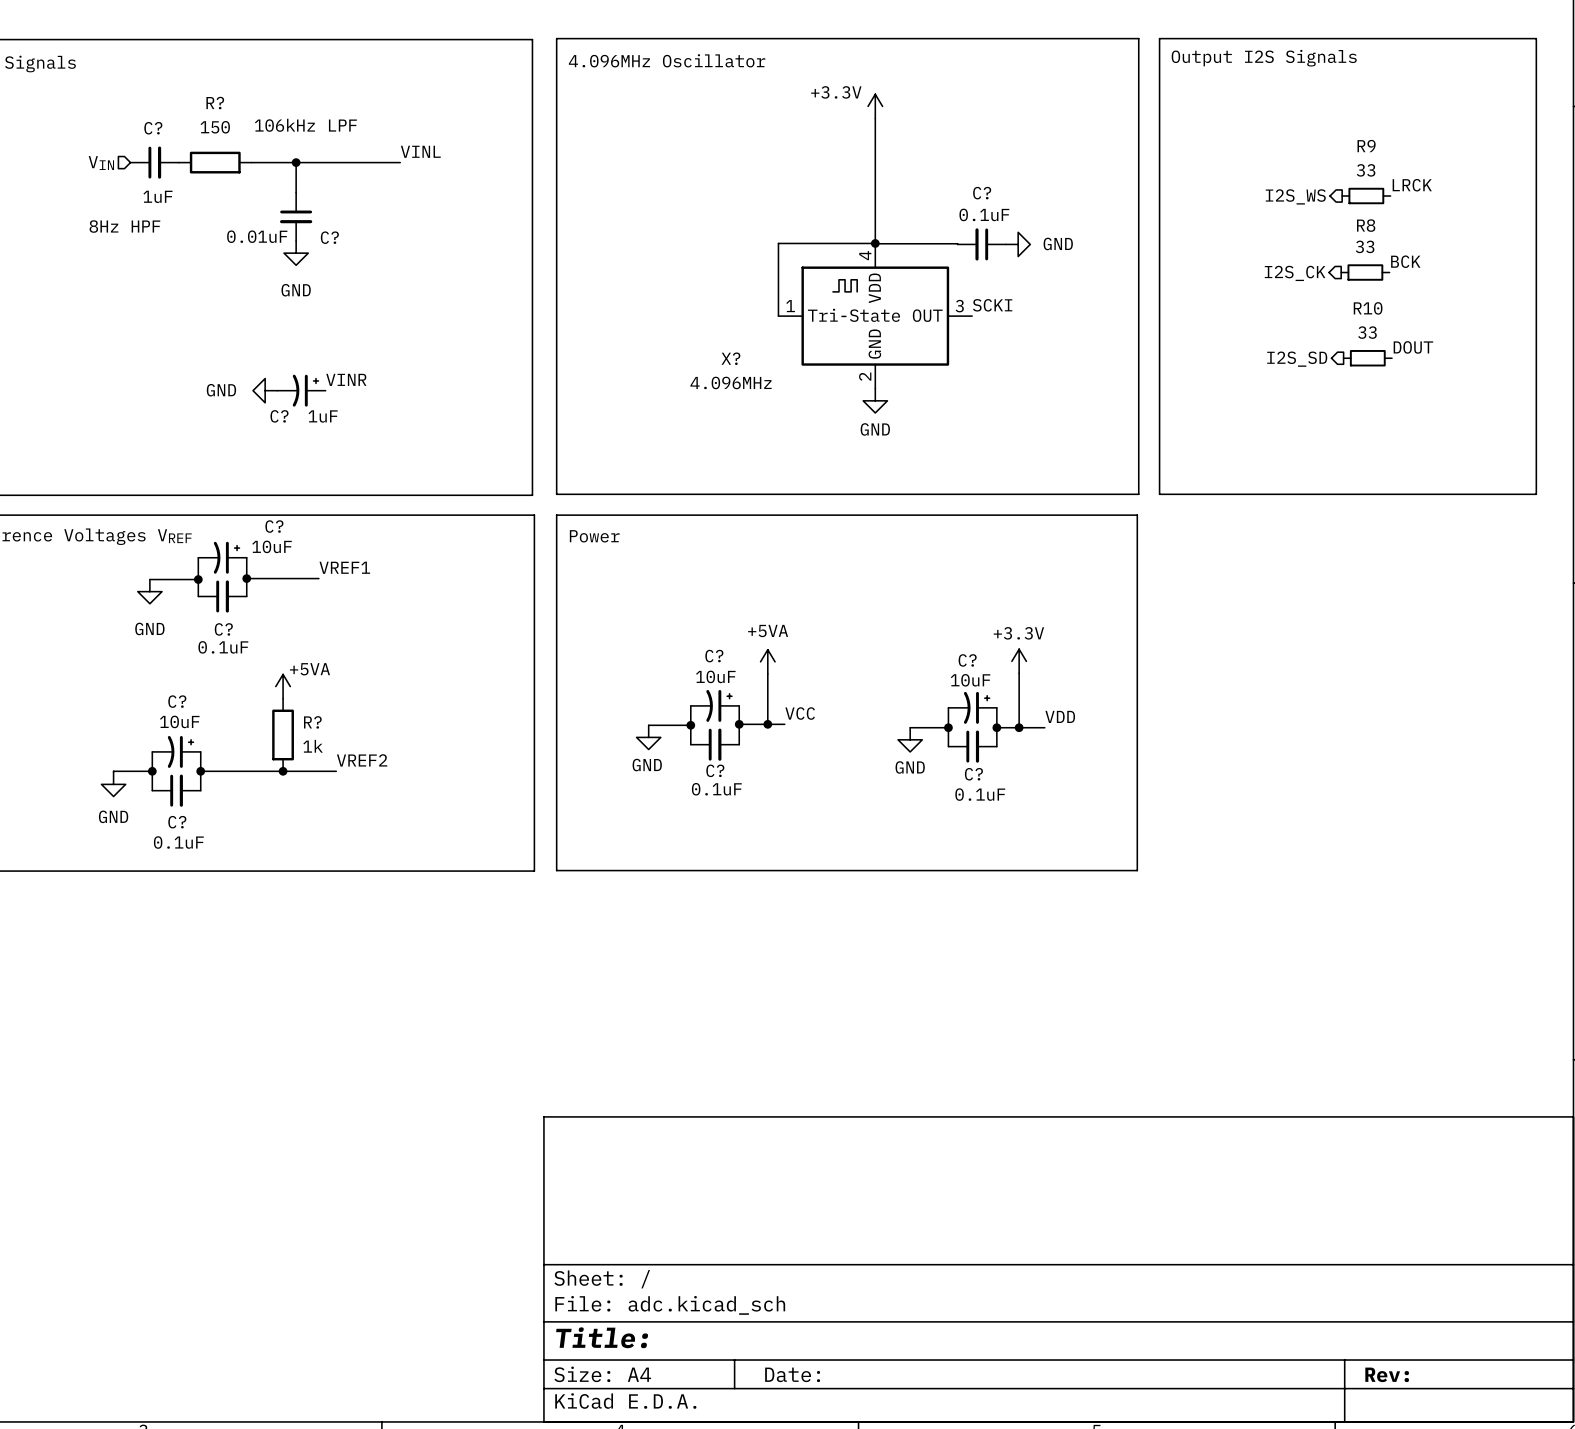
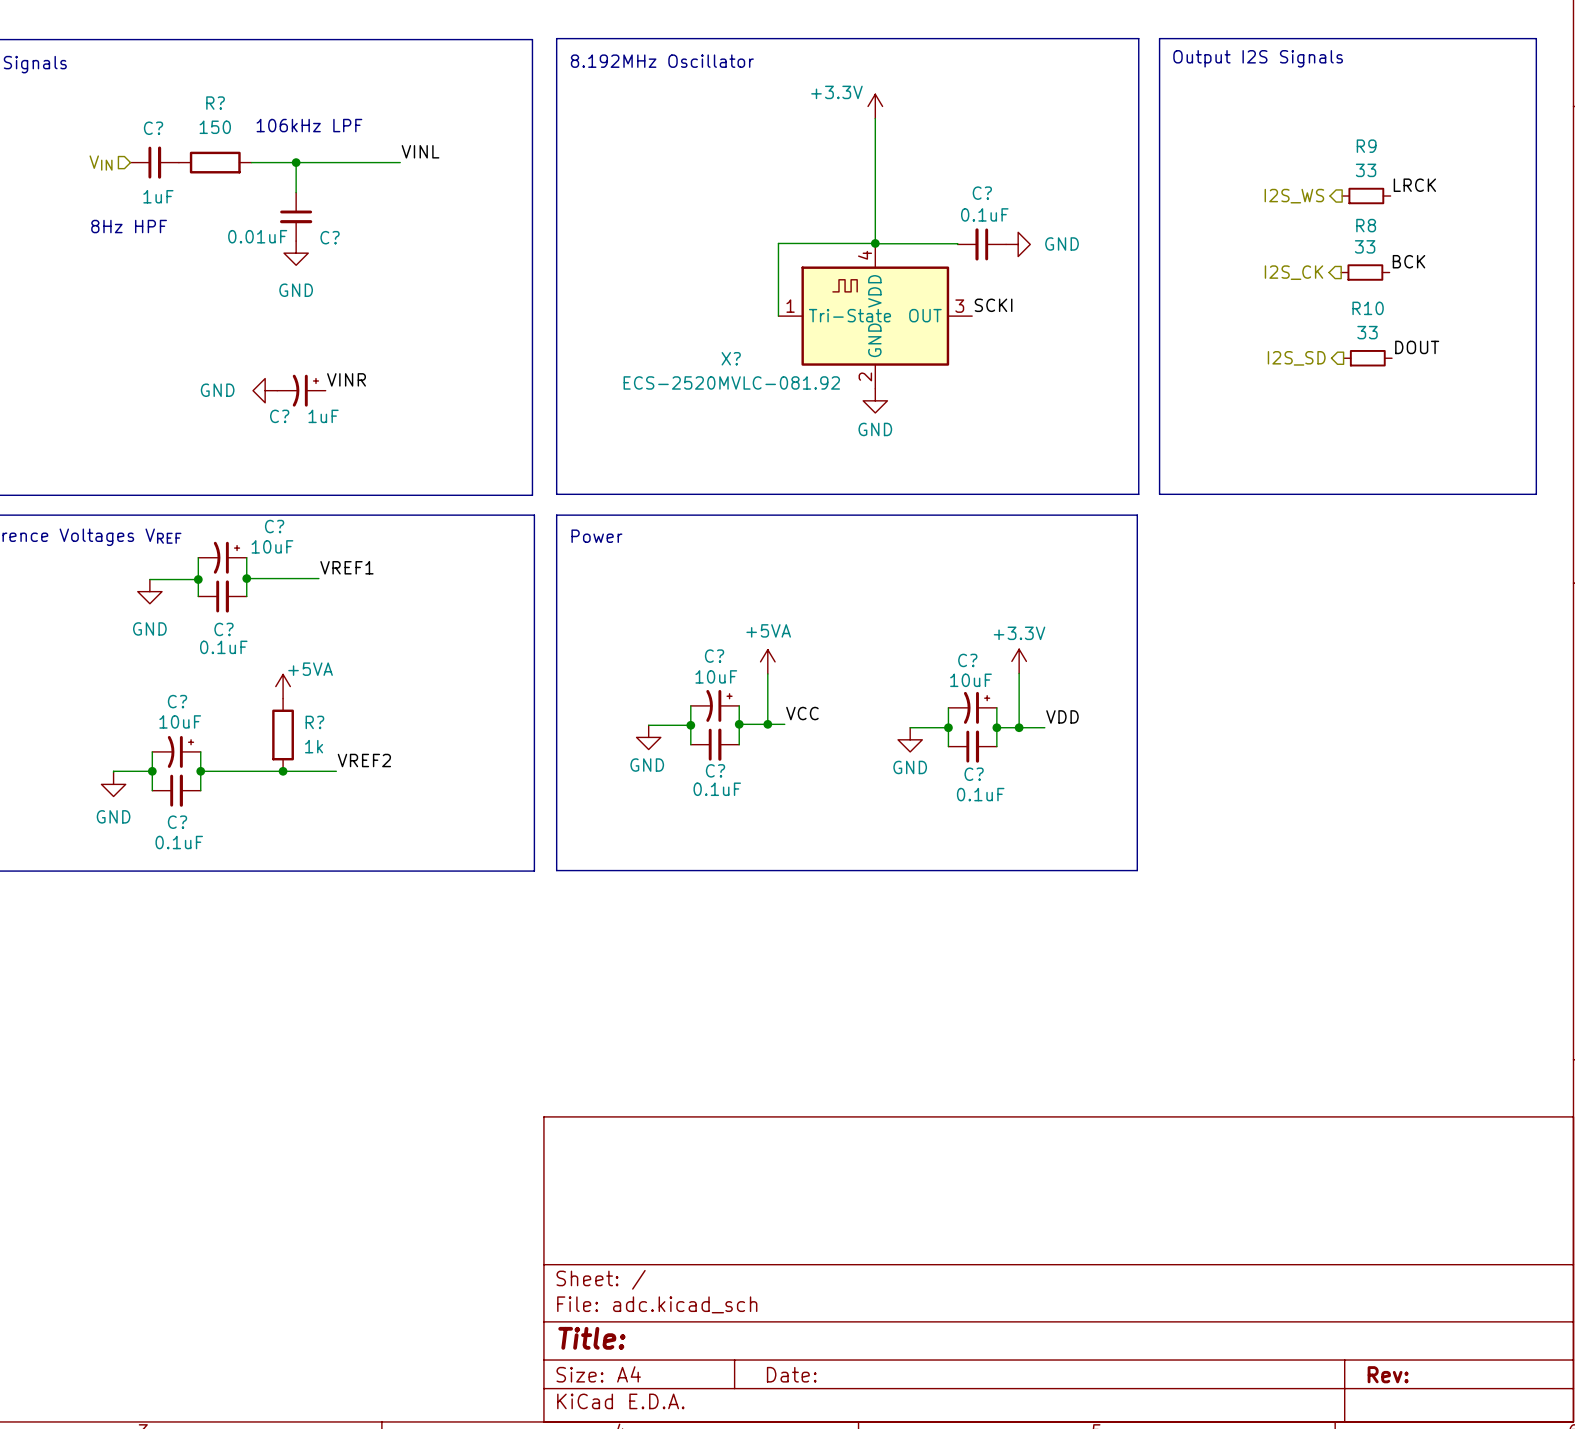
text: 4.096MHz Oscillator (667, 60) -> 8.192MHz Oscillator (662, 61)
X? value: 4.096MHz (731, 382) -> ECS-2520MVLC-081.92 (731, 382)

